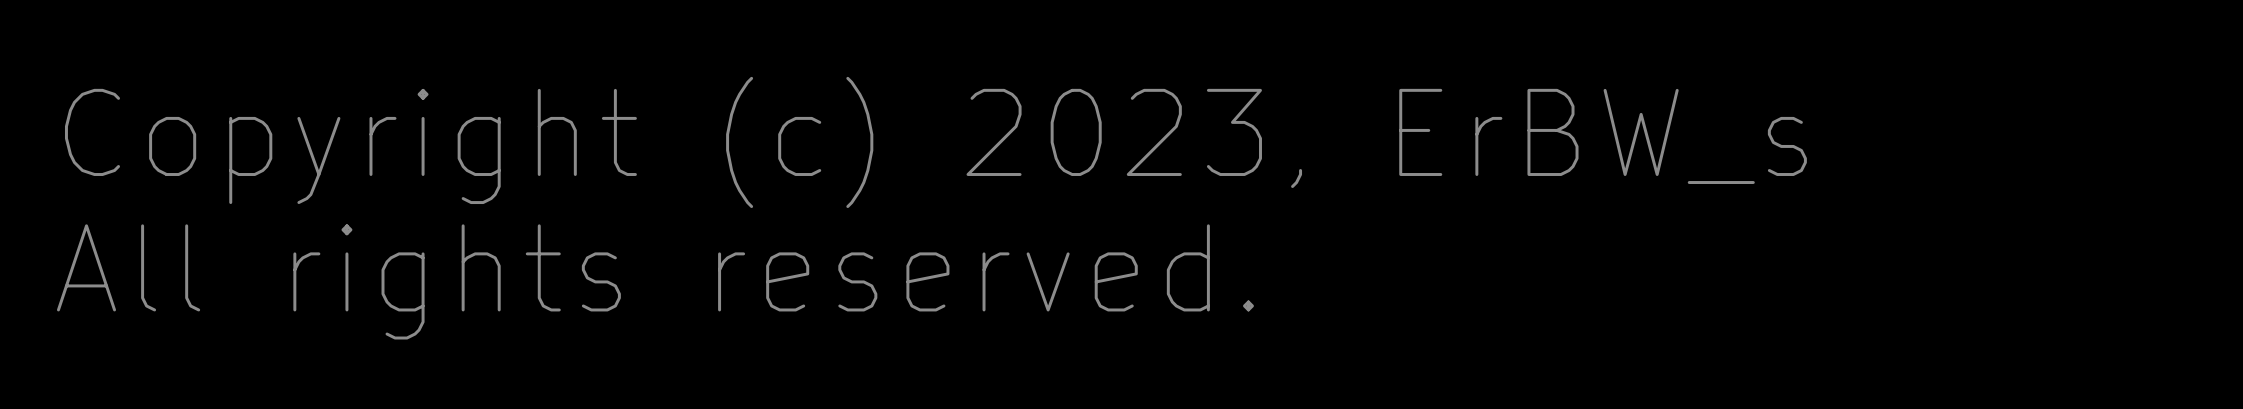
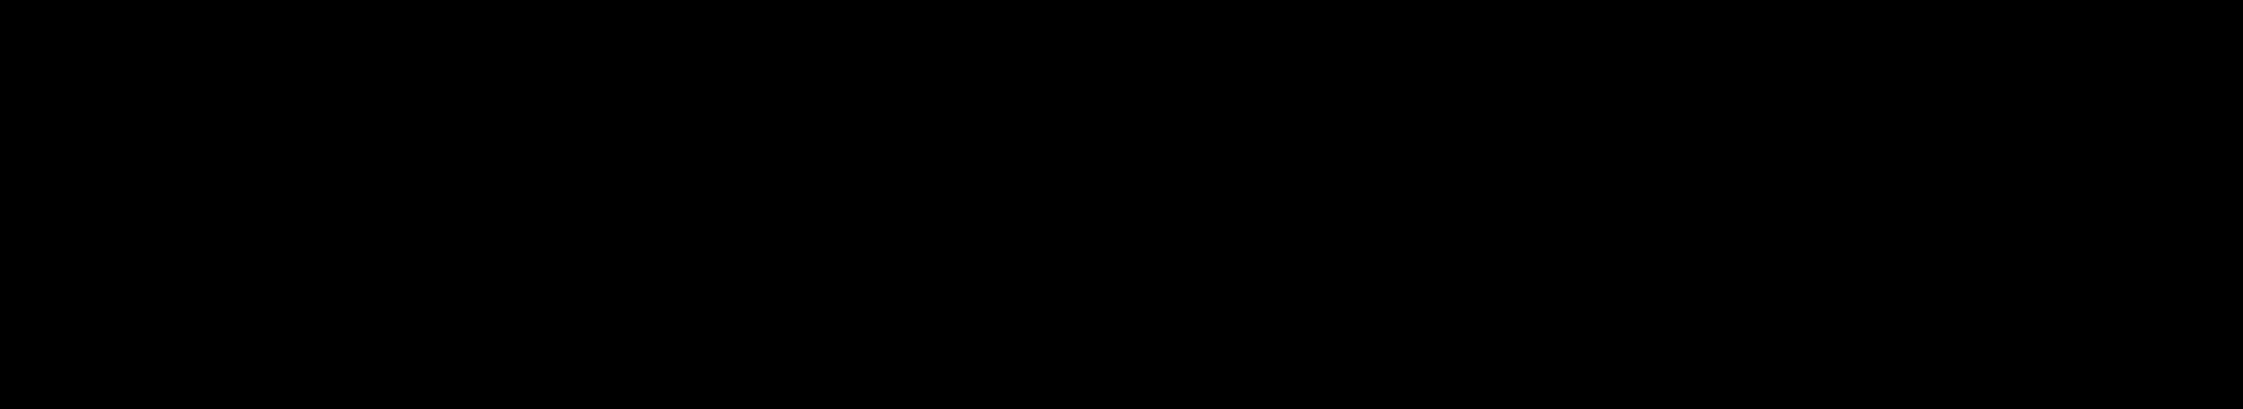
text: Copyright (c) 2023, ErBW_s (935, 142) -> none
text: All rights reserved. (655, 281) -> none

